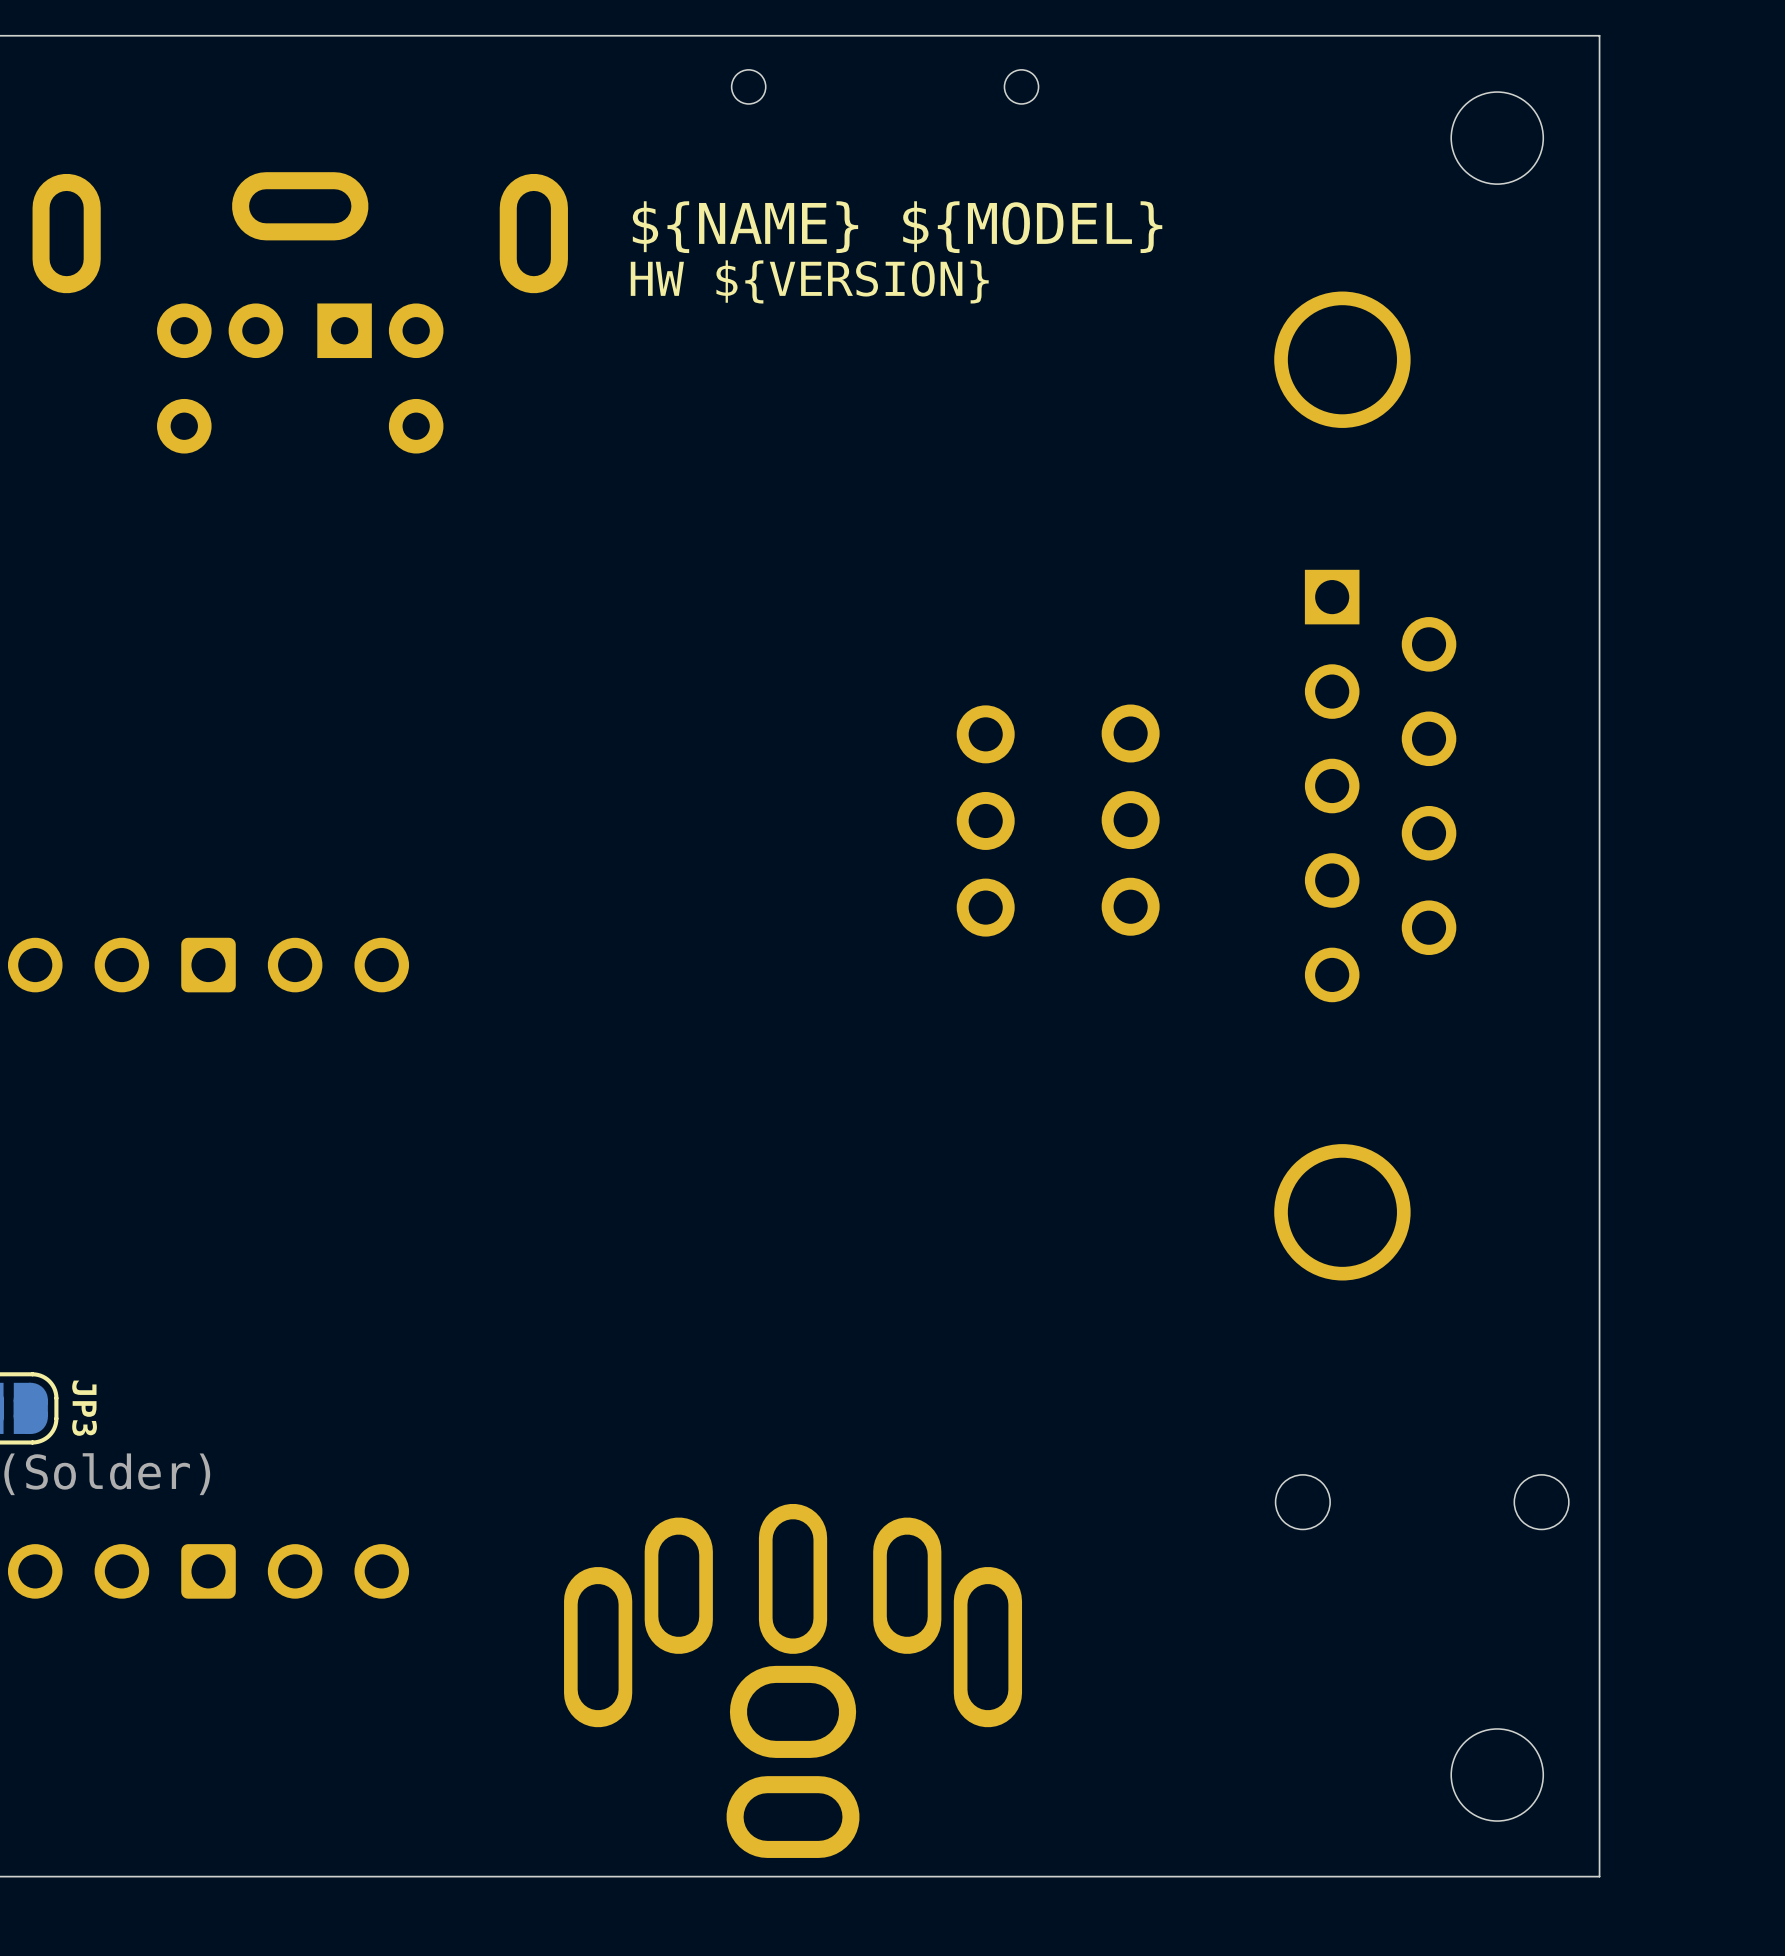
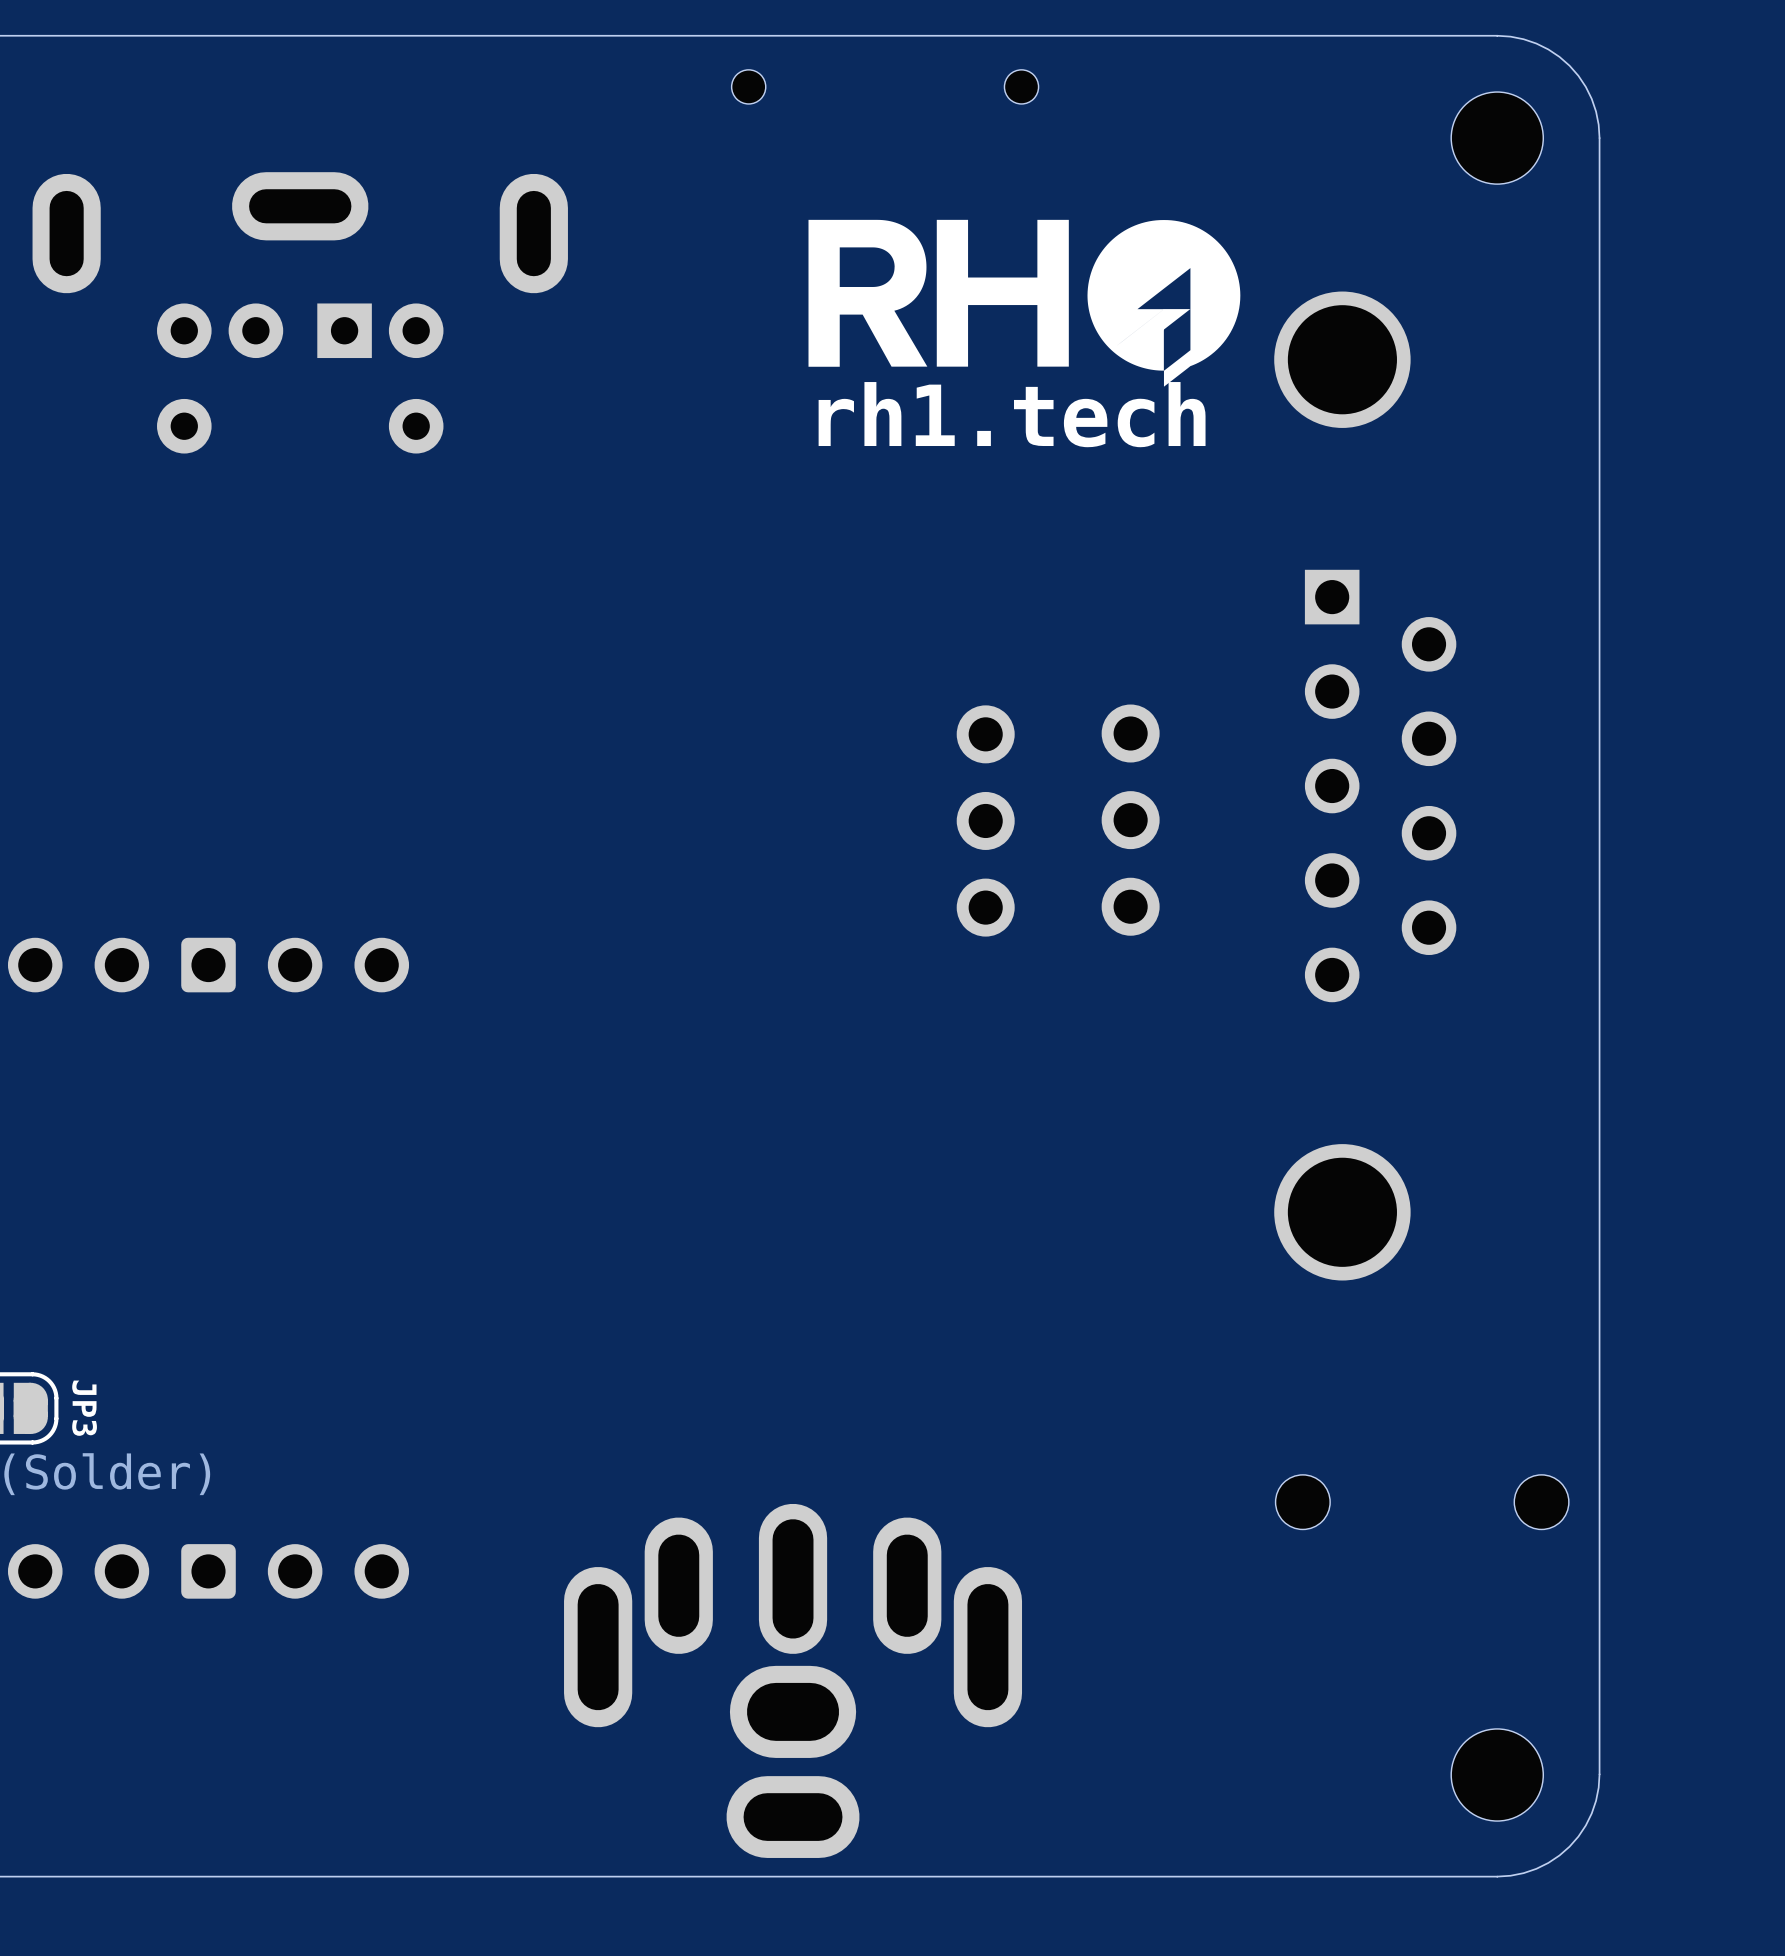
board edge: (1497, 35) (1599, 35) (1599, 138) -> (1497, 35) (1523, 39) (1536, 43) (1559, 56) (1569, 65) (1578, 75) (1591, 98) (1598, 124) (1599, 138)
drawing: none -> [808, 219, 1241, 387]
text: ${NAME} ${MODEL} (897, 227) -> none
text: HW ${VERSION} (809, 281) -> none
text: none -> rh1.tech (1012, 414)
board edge: (1599, 1774) (1599, 1876) (1497, 1876) -> (1599, 1774) (1598, 1787) (1591, 1813) (1585, 1825) (1569, 1846) (1559, 1855) (1536, 1868) (1523, 1873) (1497, 1876)

